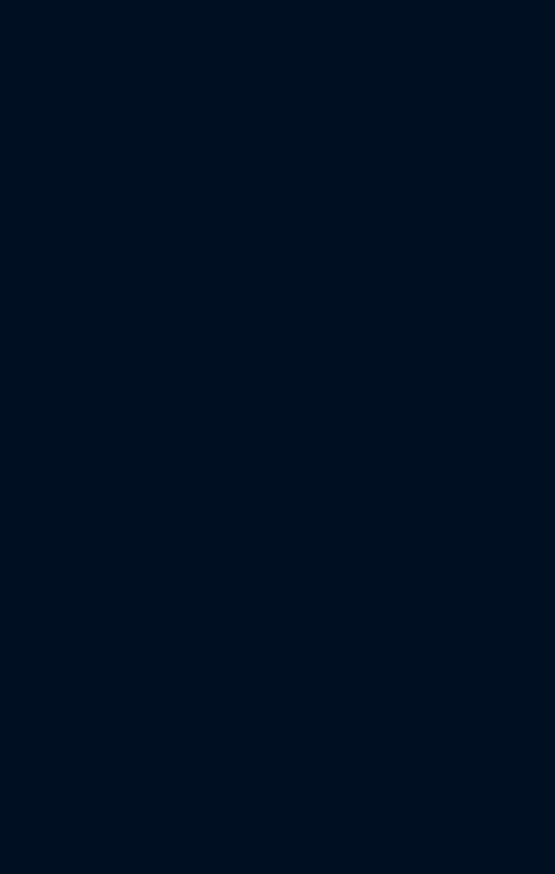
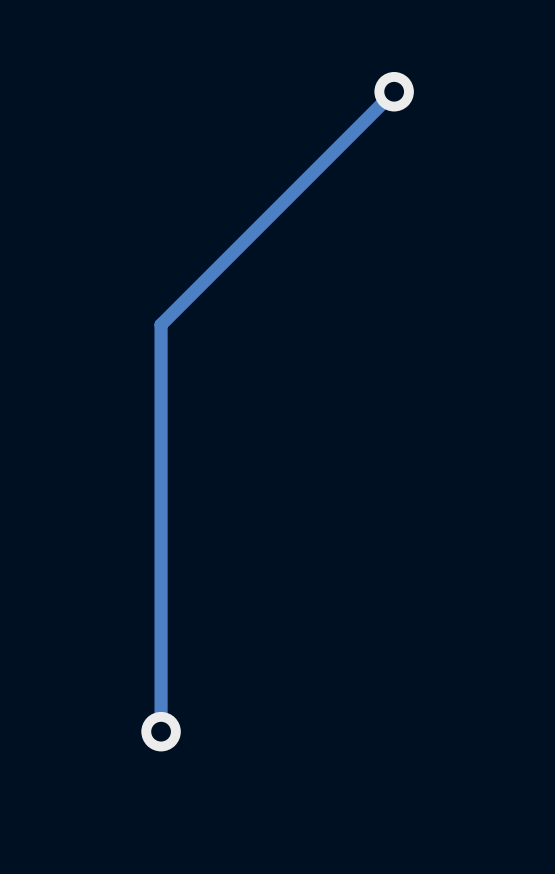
track: none -> (394, 91) (161, 324) (161, 731)
via: none -> (394, 91)
via: none -> (161, 731)

